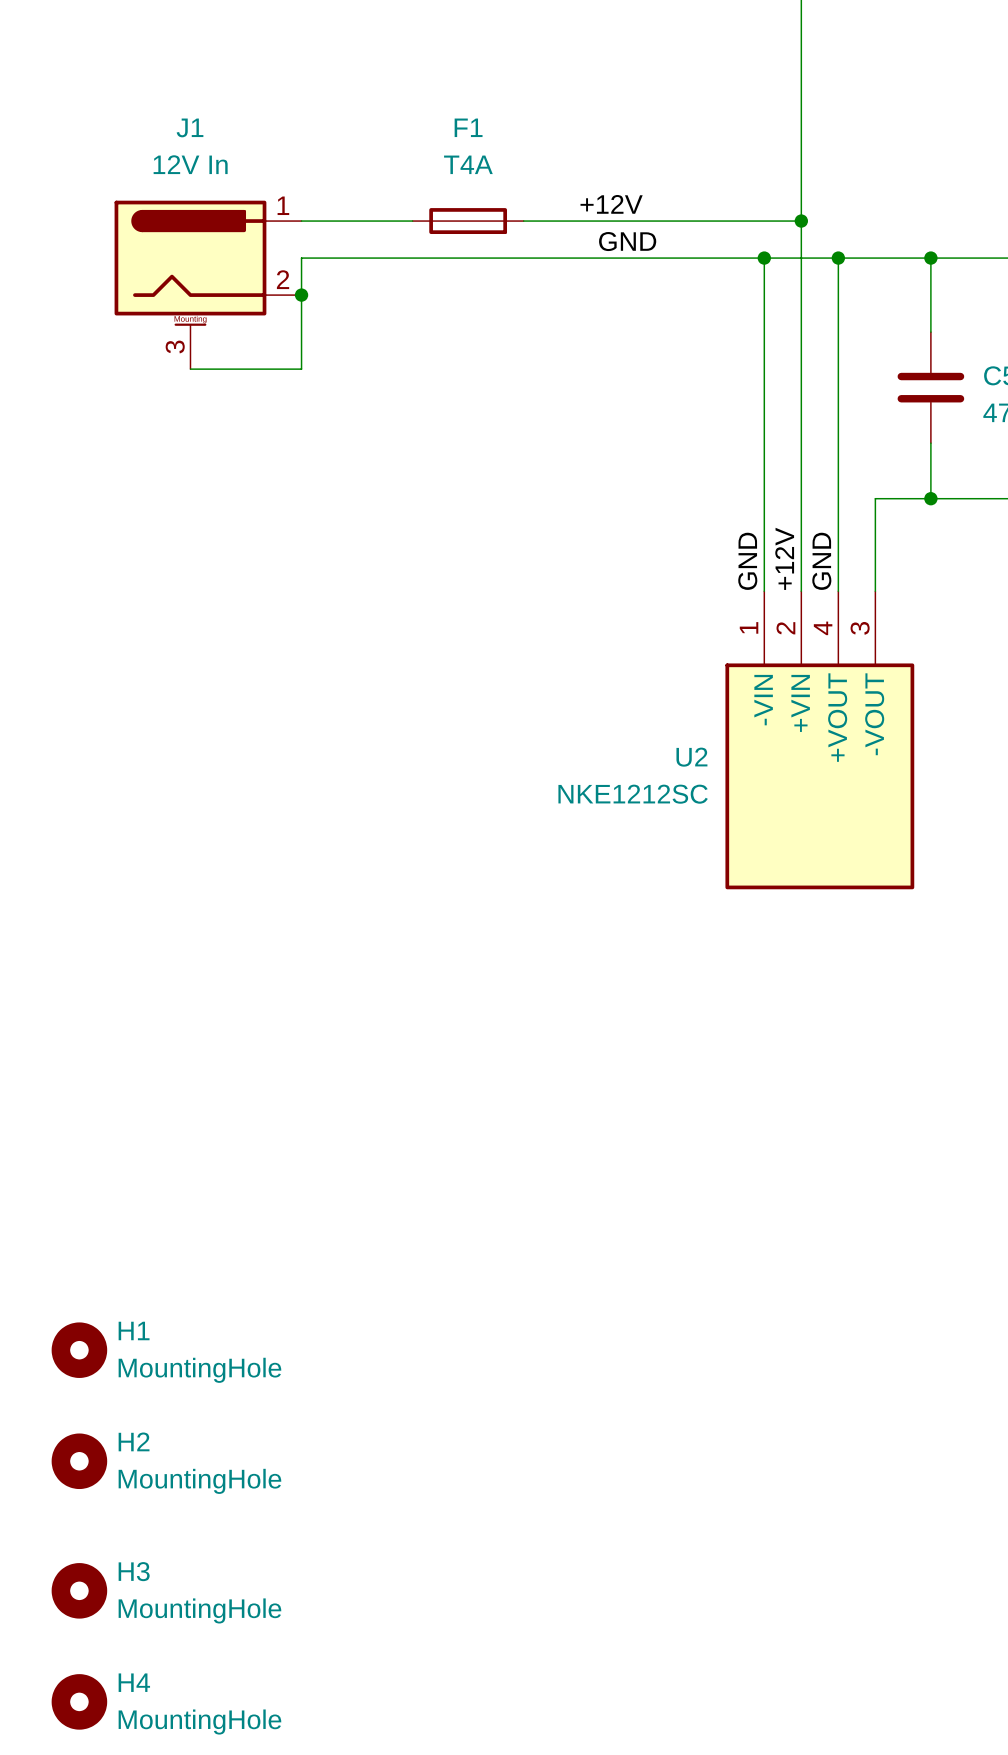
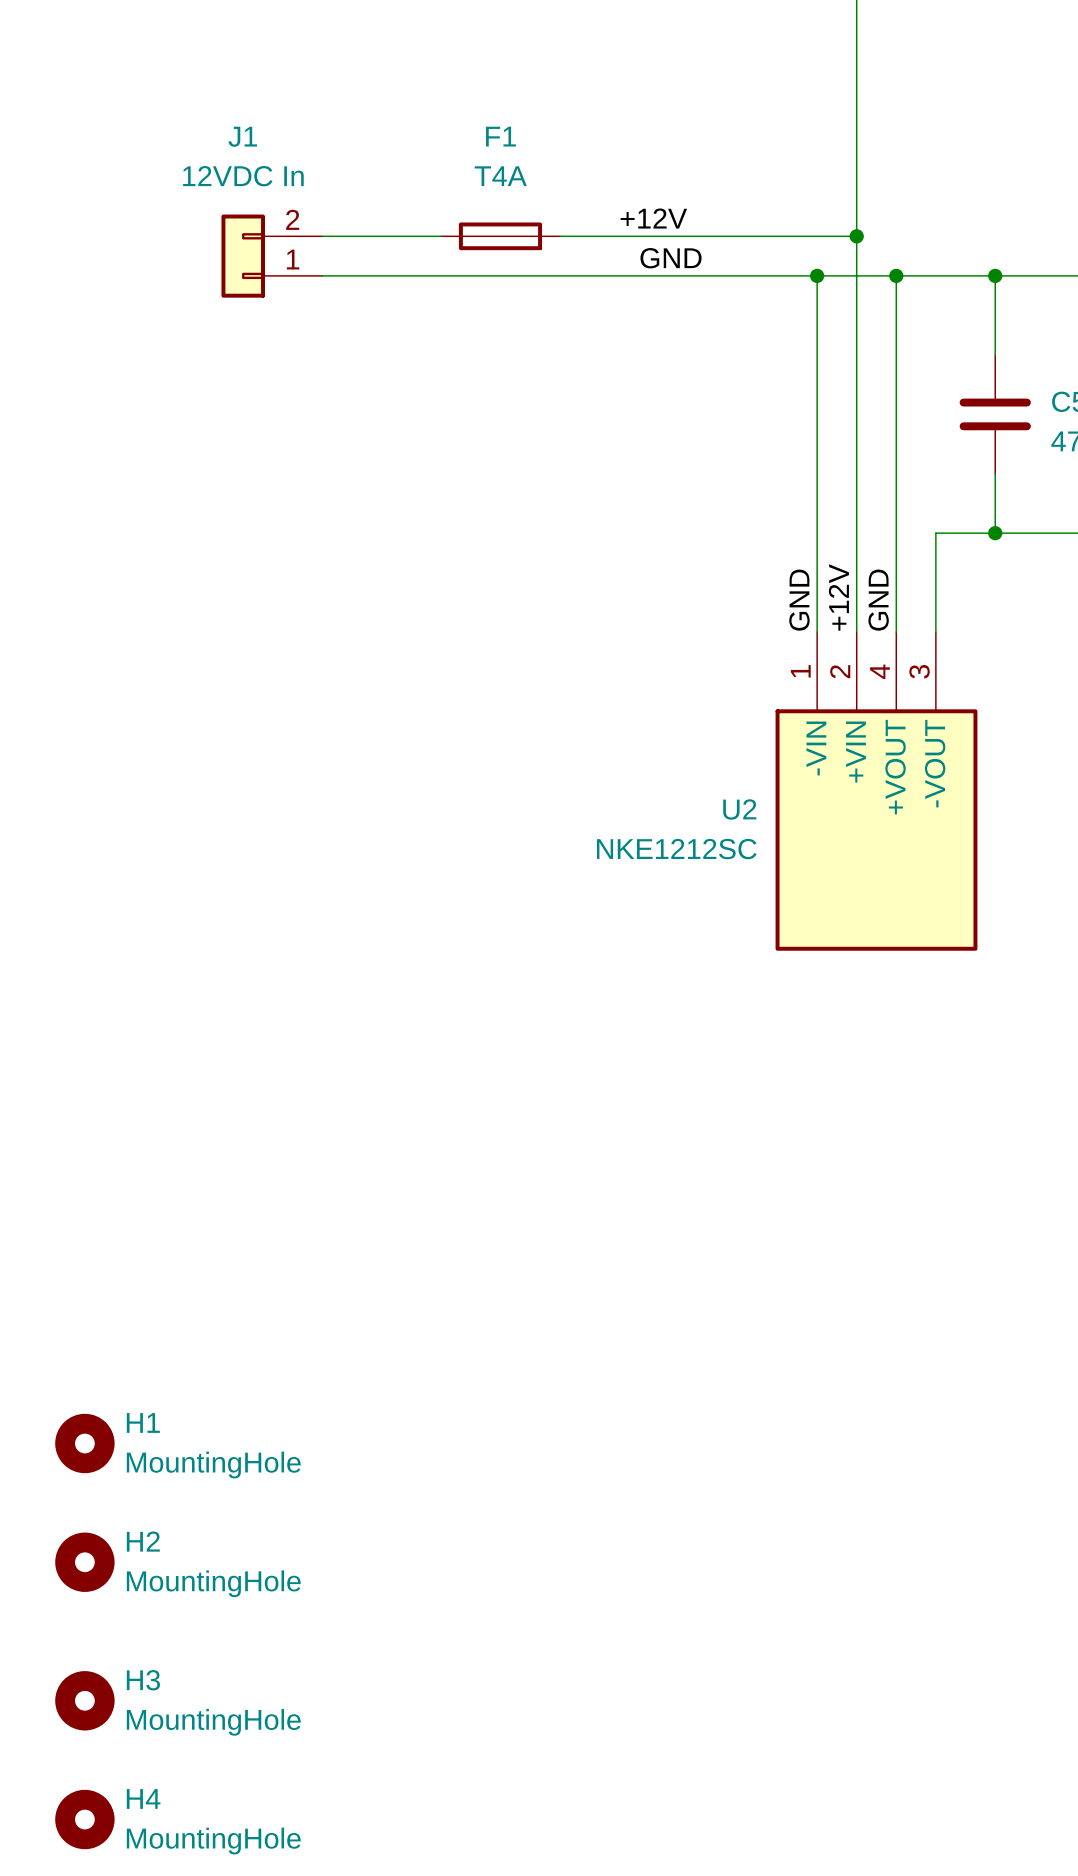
J1 name position: J1 (190, 127) -> J1 (242, 136)
J1 value: 12V In (190, 164) -> 12VDC In (243, 176)
J1 symbol: [114, 200, 302, 370] -> [221, 214, 323, 298]
wire: (301, 258) (301, 369) (190, 369) -> none
junction: (301, 295) -> none

